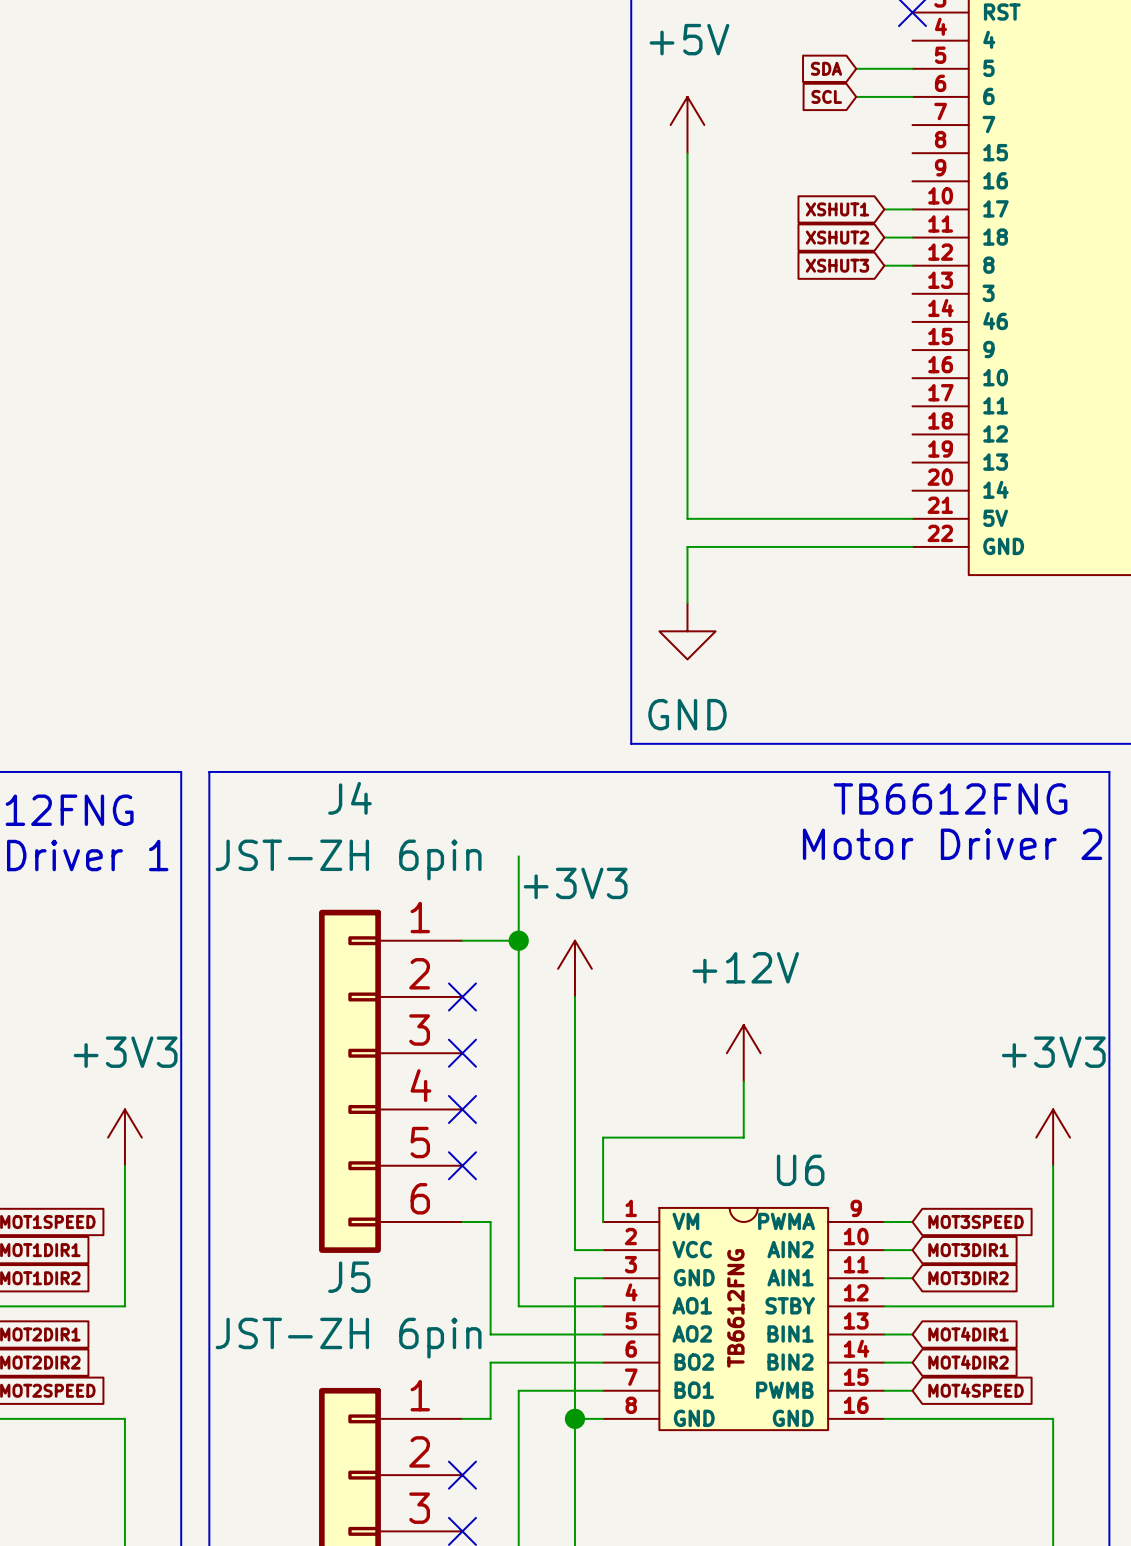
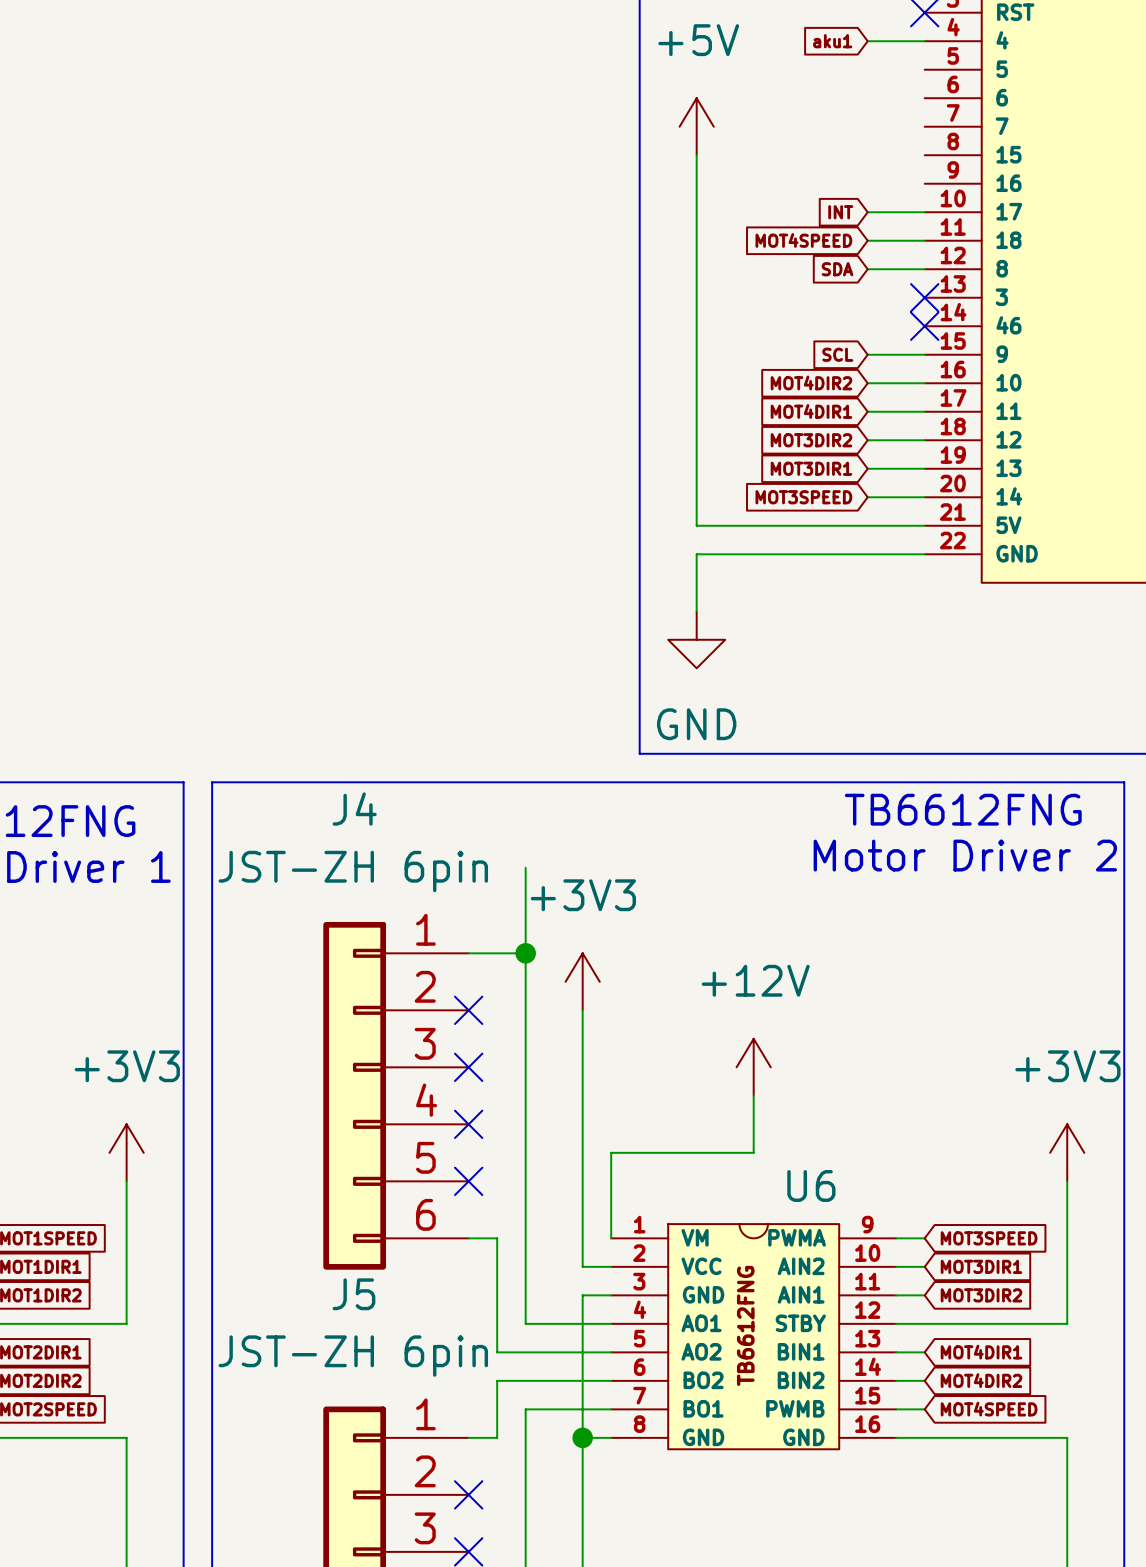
global label: none -> aku1 (832, 41)
wire: none -> (867, 41) (924, 41)
global label position: SDA (826, 68) -> SDA (837, 269)
wire: (856, 68) (912, 68) -> (867, 354) (924, 354)
global label position: SCL (826, 96) -> SCL (837, 354)
wire: (856, 96) (912, 96) -> (867, 383) (924, 383)
global label: none -> INT (840, 212)
global label: XSHUT1 (837, 209) -> none
wire: none -> (867, 212) (896, 212)
global label: none -> MOT4SPEED (803, 240)
global label: XSHUT2 (837, 237) -> none
wire: none -> (867, 240) (896, 240)
global label: XSHUT3 (837, 265) -> none
wire: none -> (867, 269) (896, 269)
no-connect mark: none -> (924, 297)
no-connect mark: none -> (924, 326)
global label: none -> MOT4DIR2 (811, 382)
global label: none -> MOT4DIR1 (811, 411)
wire: none -> (867, 411) (924, 411)
global label: none -> MOT3DIR2 (811, 440)
wire: none -> (867, 440) (924, 440)
global label: none -> MOT3DIR1 (811, 468)
wire: none -> (867, 468) (924, 468)
global label: none -> MOT3SPEED (803, 497)
wire: none -> (867, 497) (924, 497)

